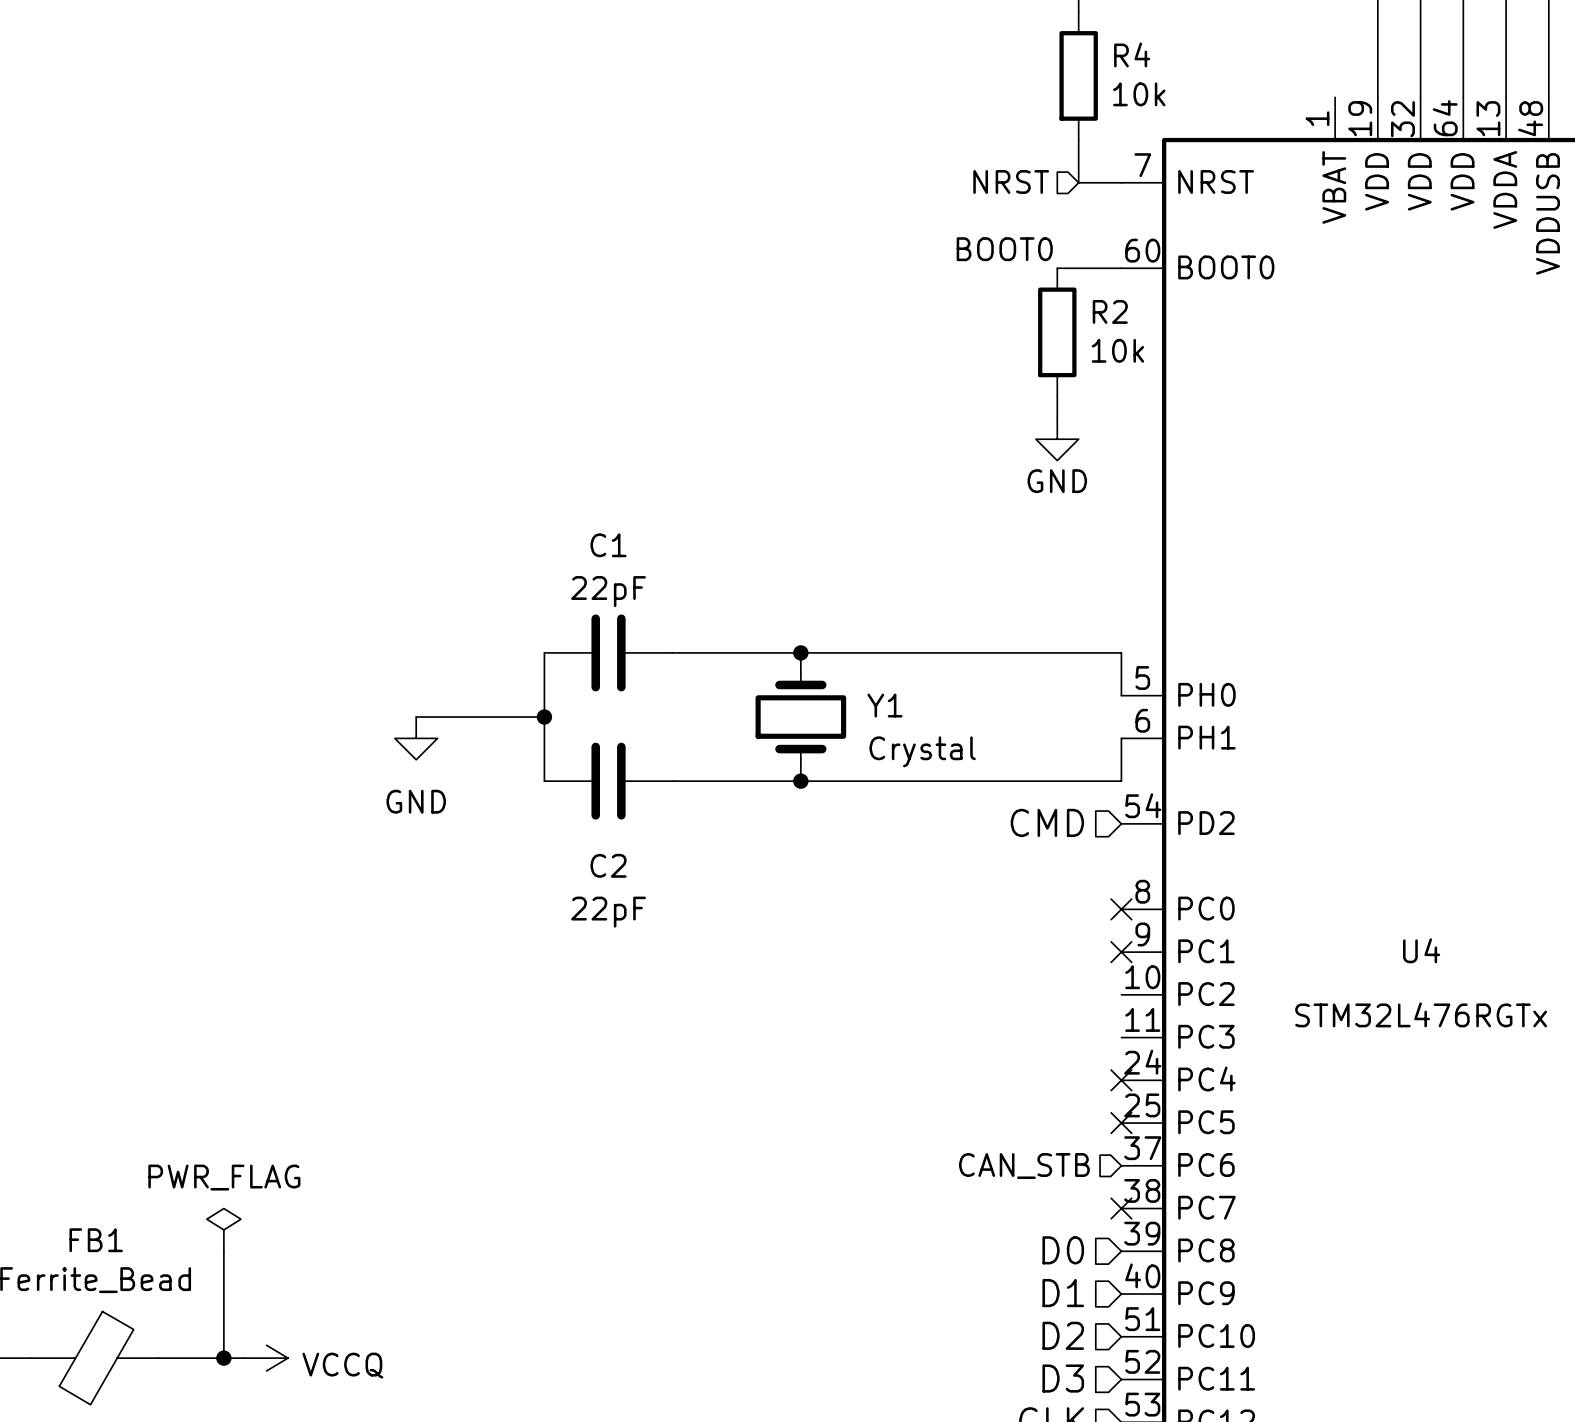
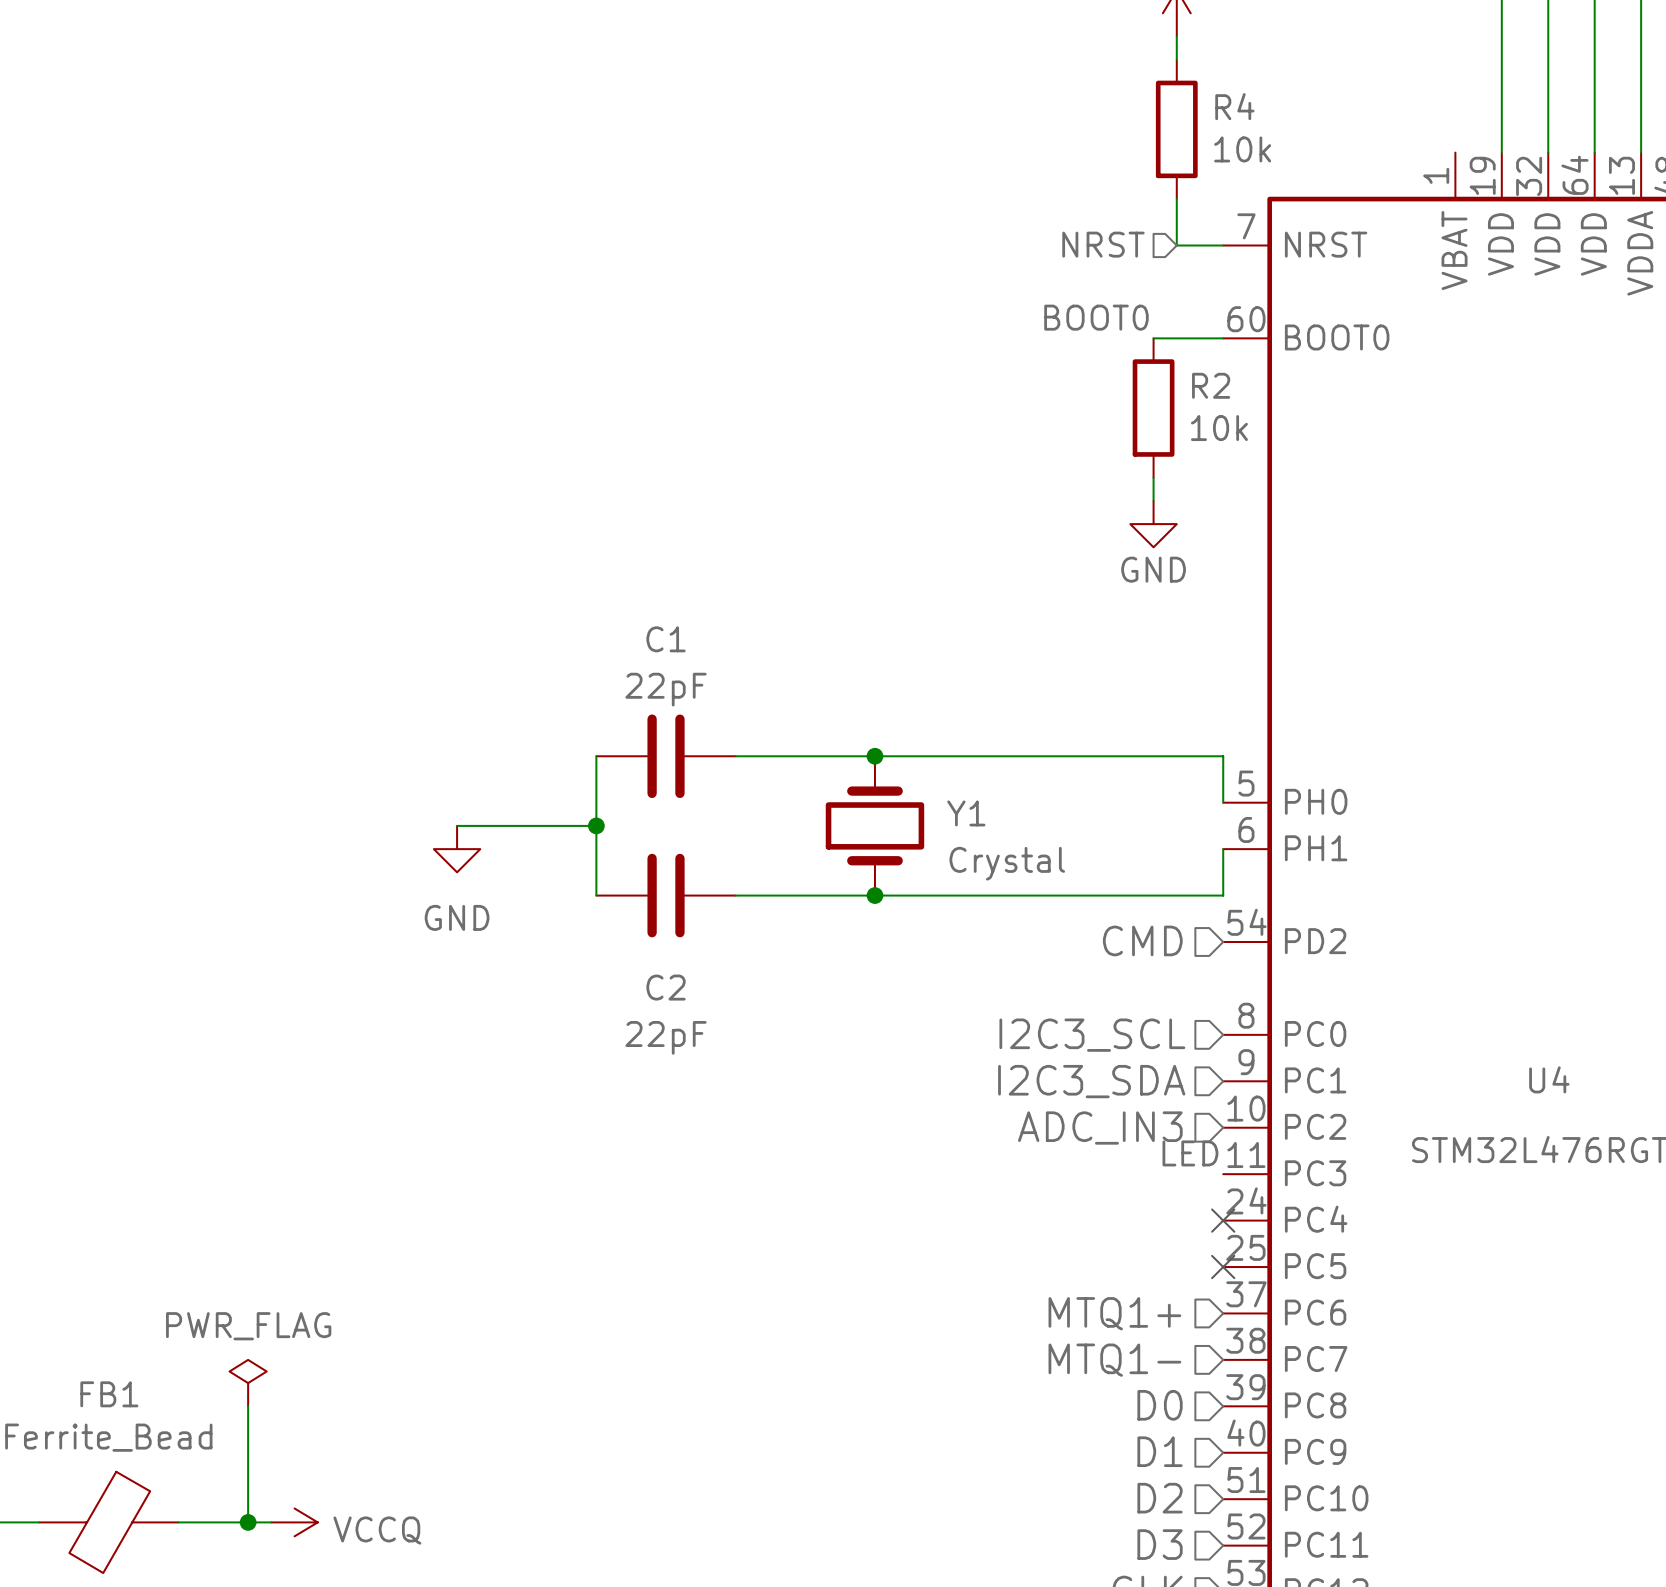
hierarchical label: none -> I2C3_SCL (1092, 1035)
no-connect mark: (1121, 909) -> none
hierarchical label: none -> I2C3_SDA (1091, 1081)
no-connect mark: (1121, 952) -> none
hierarchical label: none -> ADC_IN3 (1100, 1128)
label: none -> LED (1190, 1153)
hierarchical label: CAN_STB (1024, 1166) -> MTQ1+ (1114, 1313)
hierarchical label: none -> MTQ1- (1114, 1360)
no-connect mark: (1121, 1208) -> none

